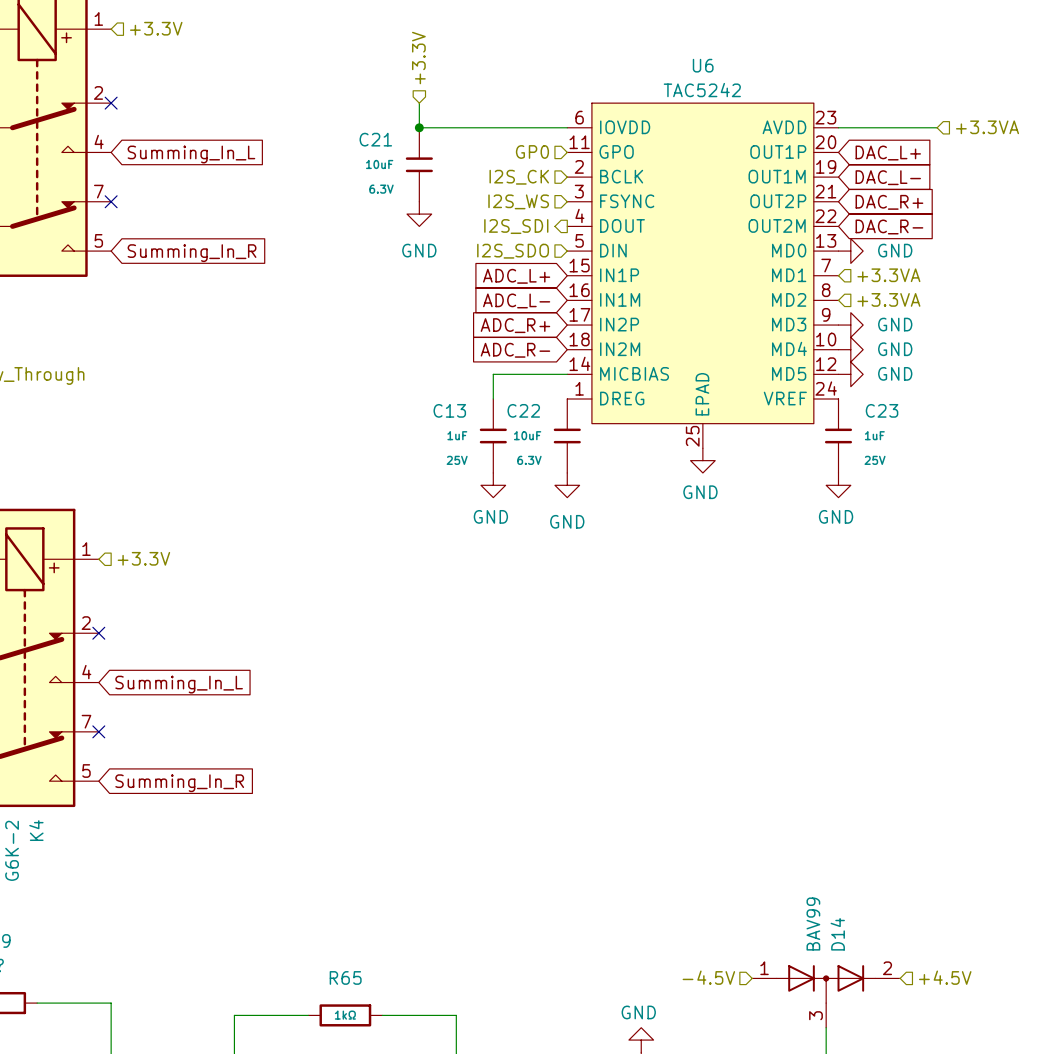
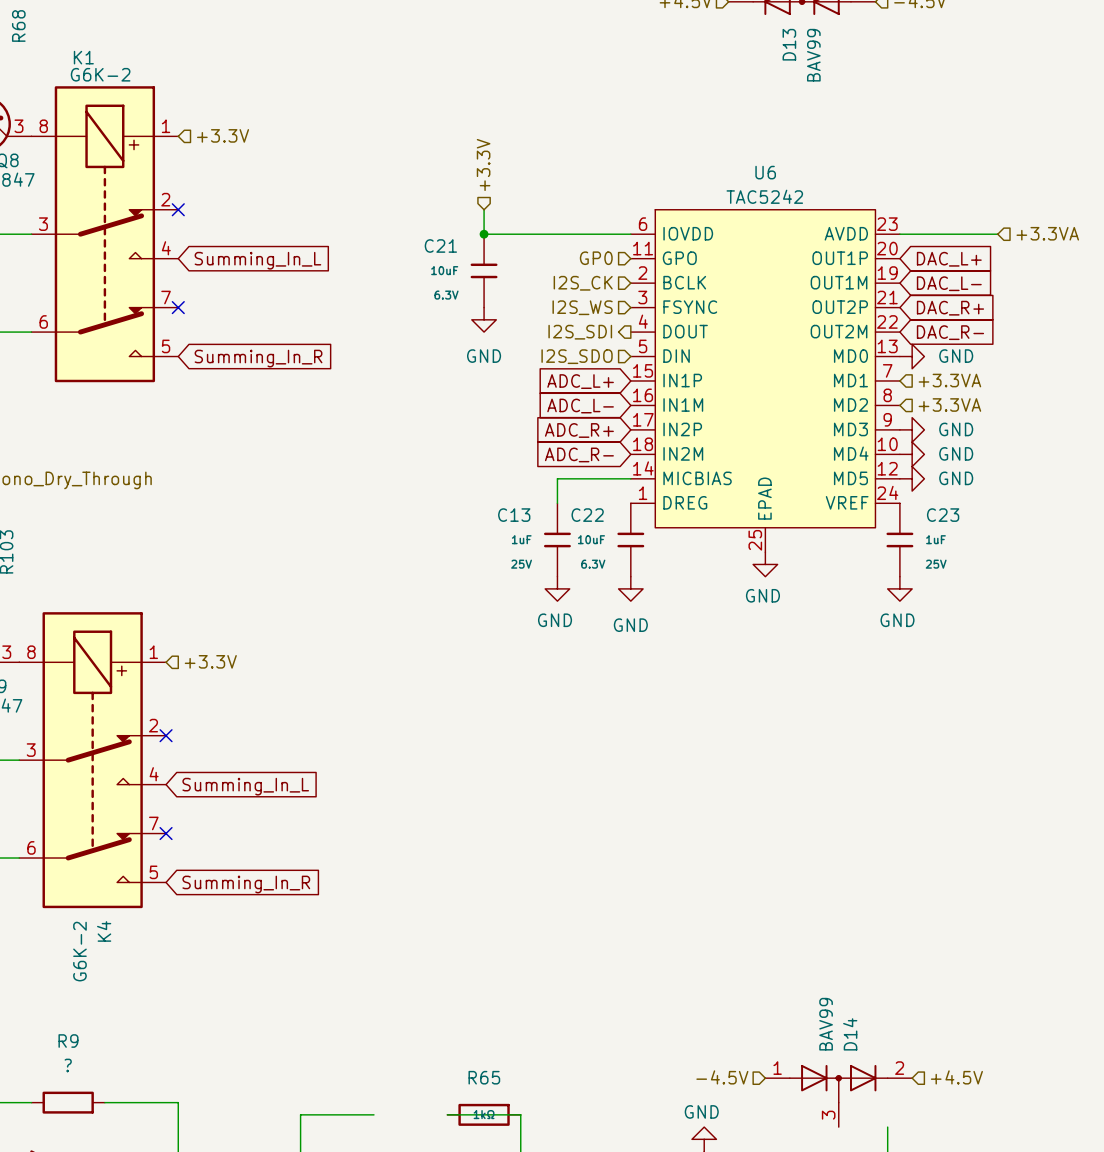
hierarchical label position: -4.5V (708, 977) -> -4.5V (722, 1077)
hierarchical label position: +4.5V (945, 977) -> +4.5V (956, 1077)
D14 position: (826, 996) -> (838, 1096)
R65 position: (345, 1015) -> (484, 1114)

